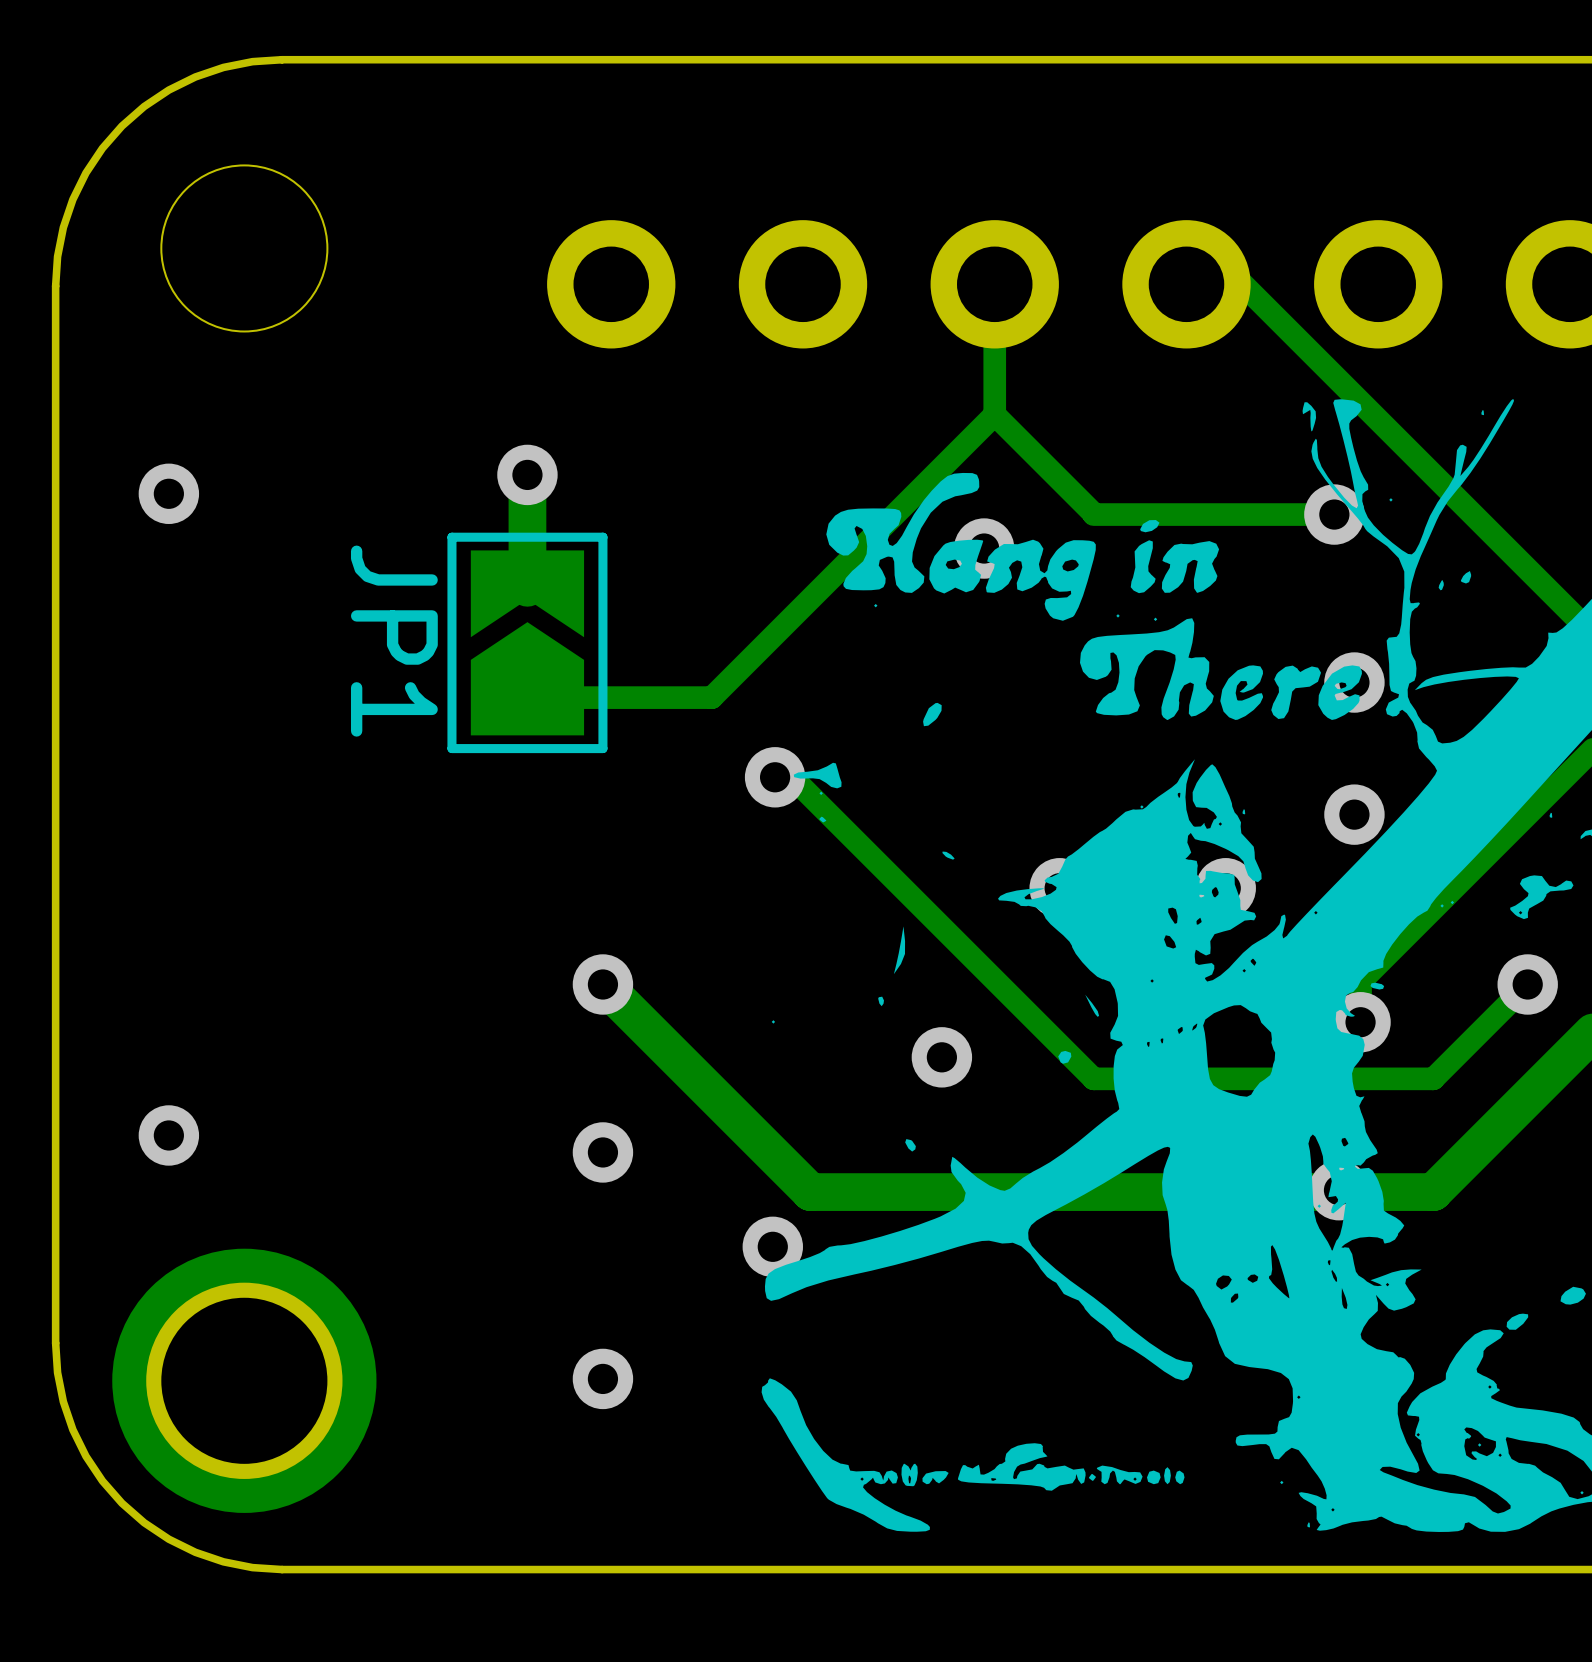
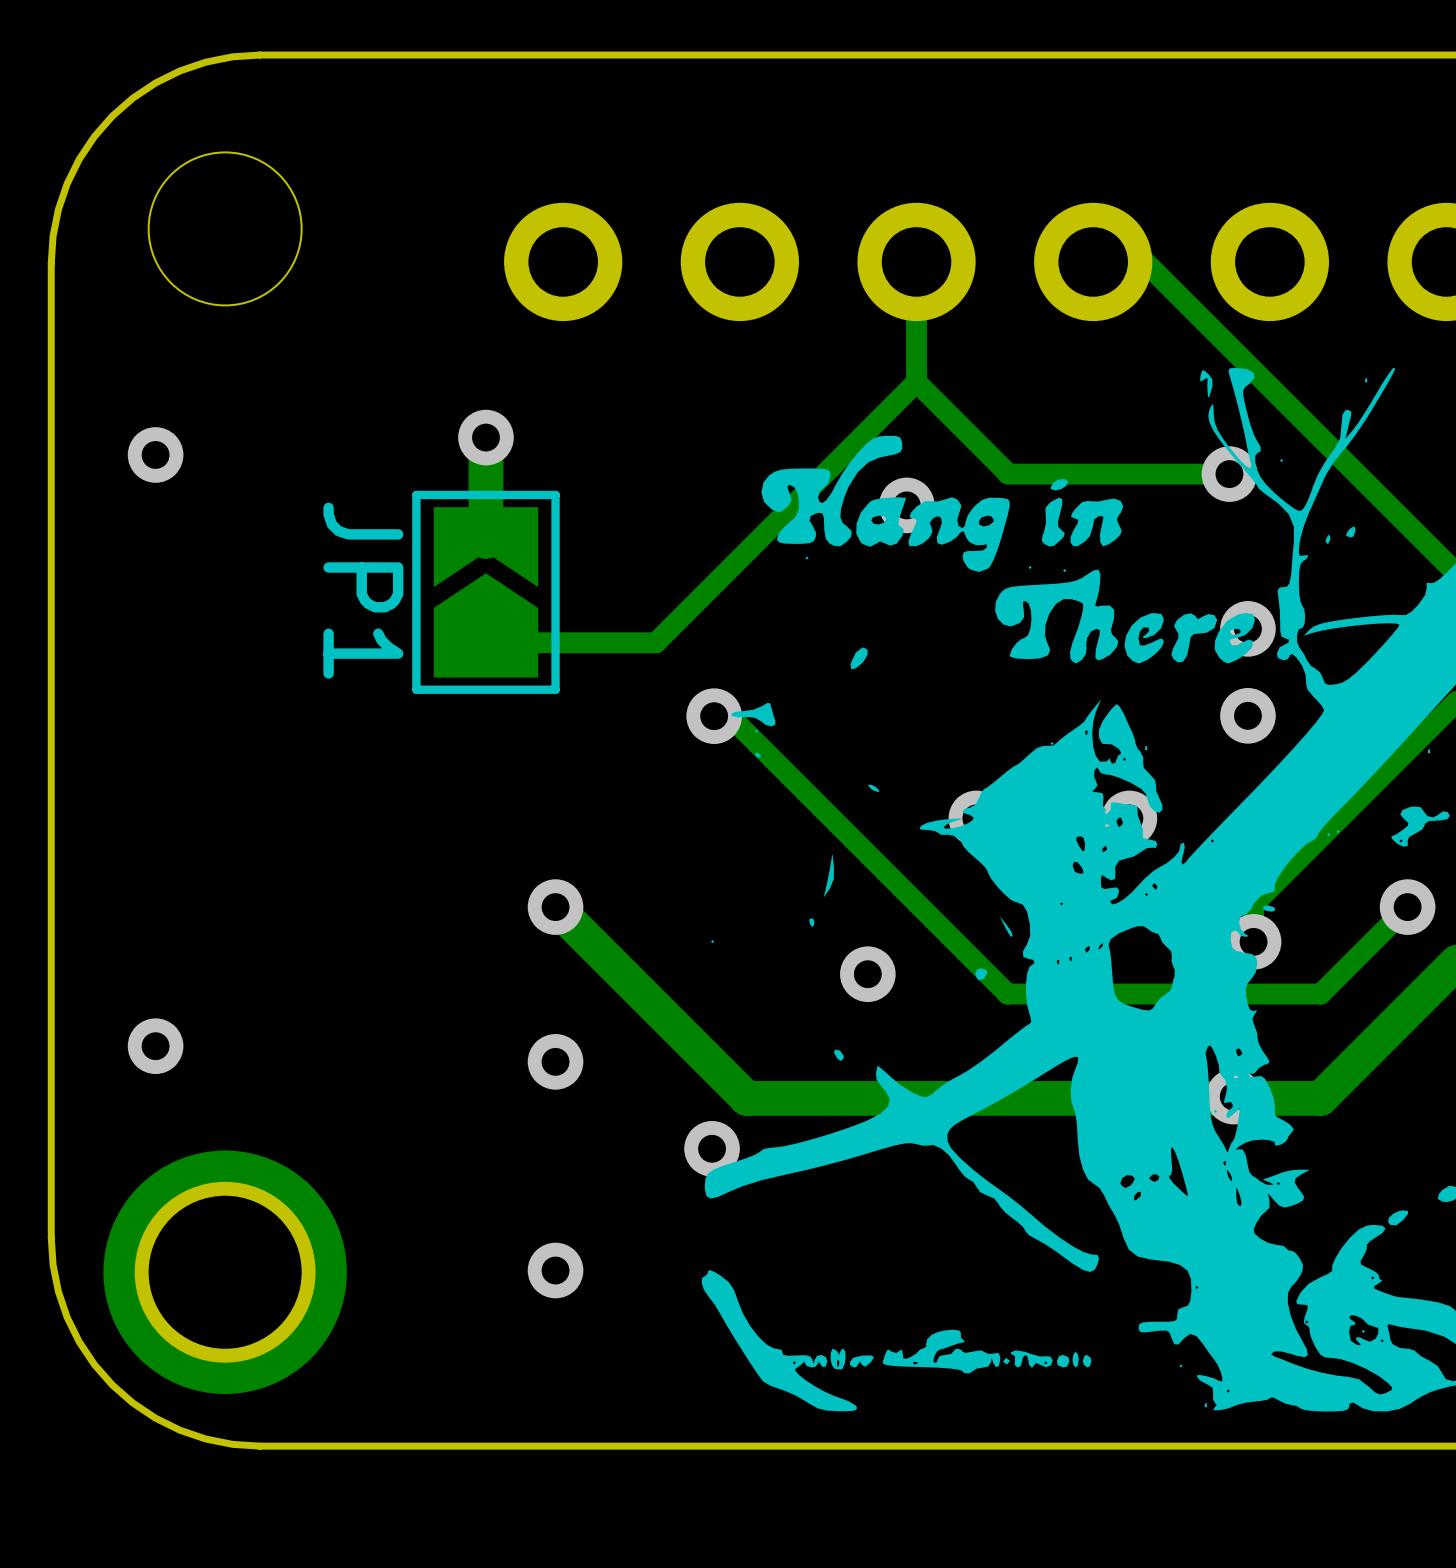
via position: (1354, 814) -> (1247, 715)

